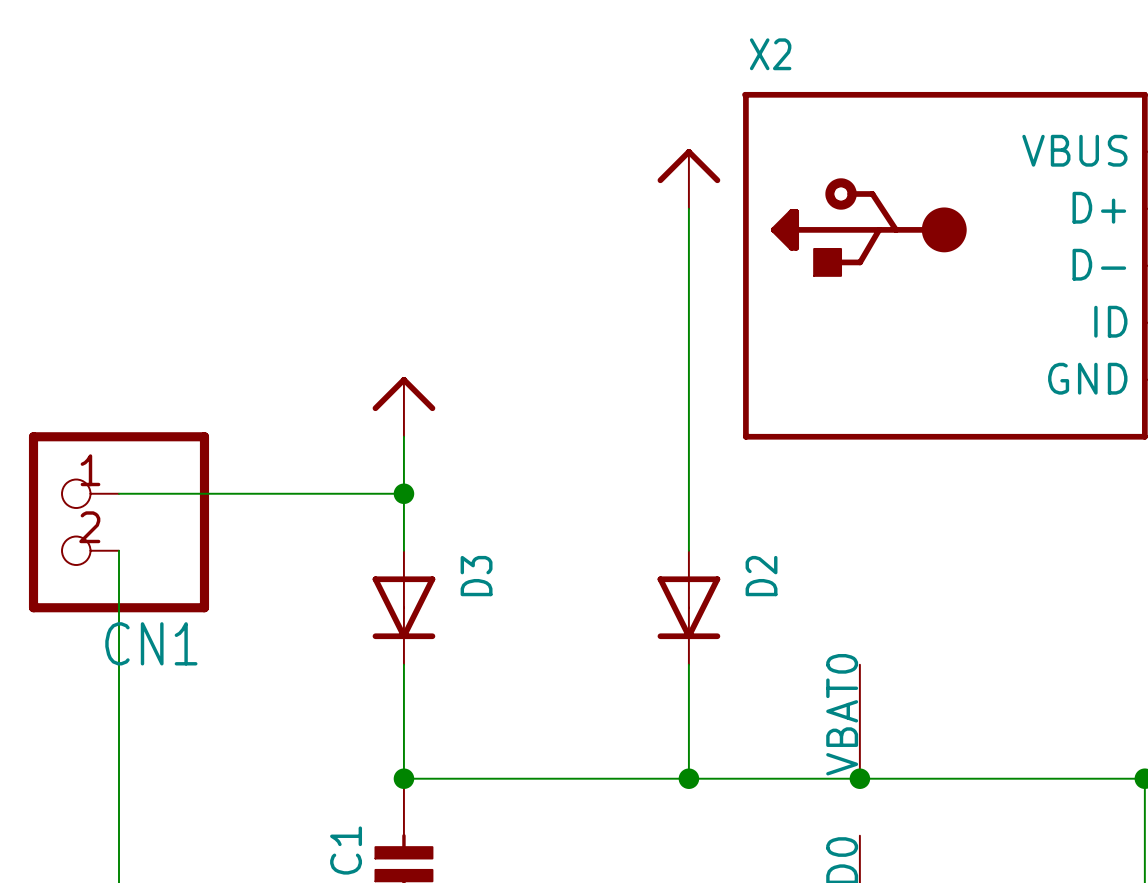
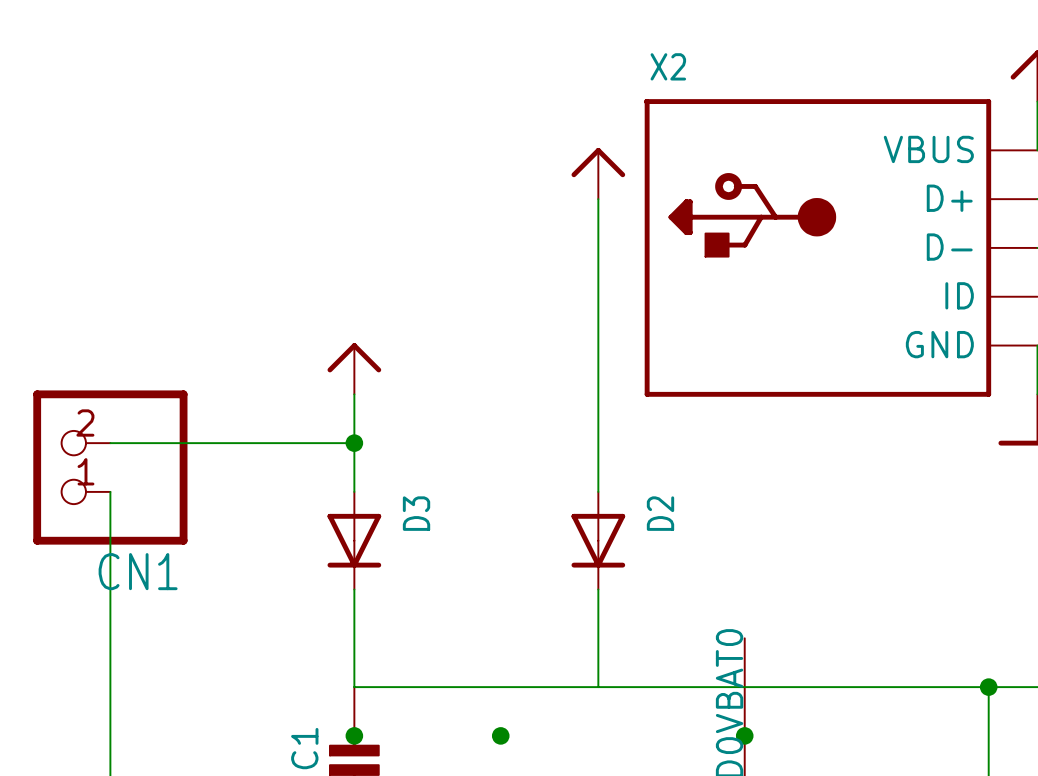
CN1 flip: as is (119, 522) -> up-down (110, 467)
VBAT0 position: (859, 721) -> (744, 687)
junction: (403, 778) -> none
junction: (688, 778) -> none
junction position: (859, 778) -> (744, 735)
junction: none -> (354, 735)
junction: none -> (500, 735)

